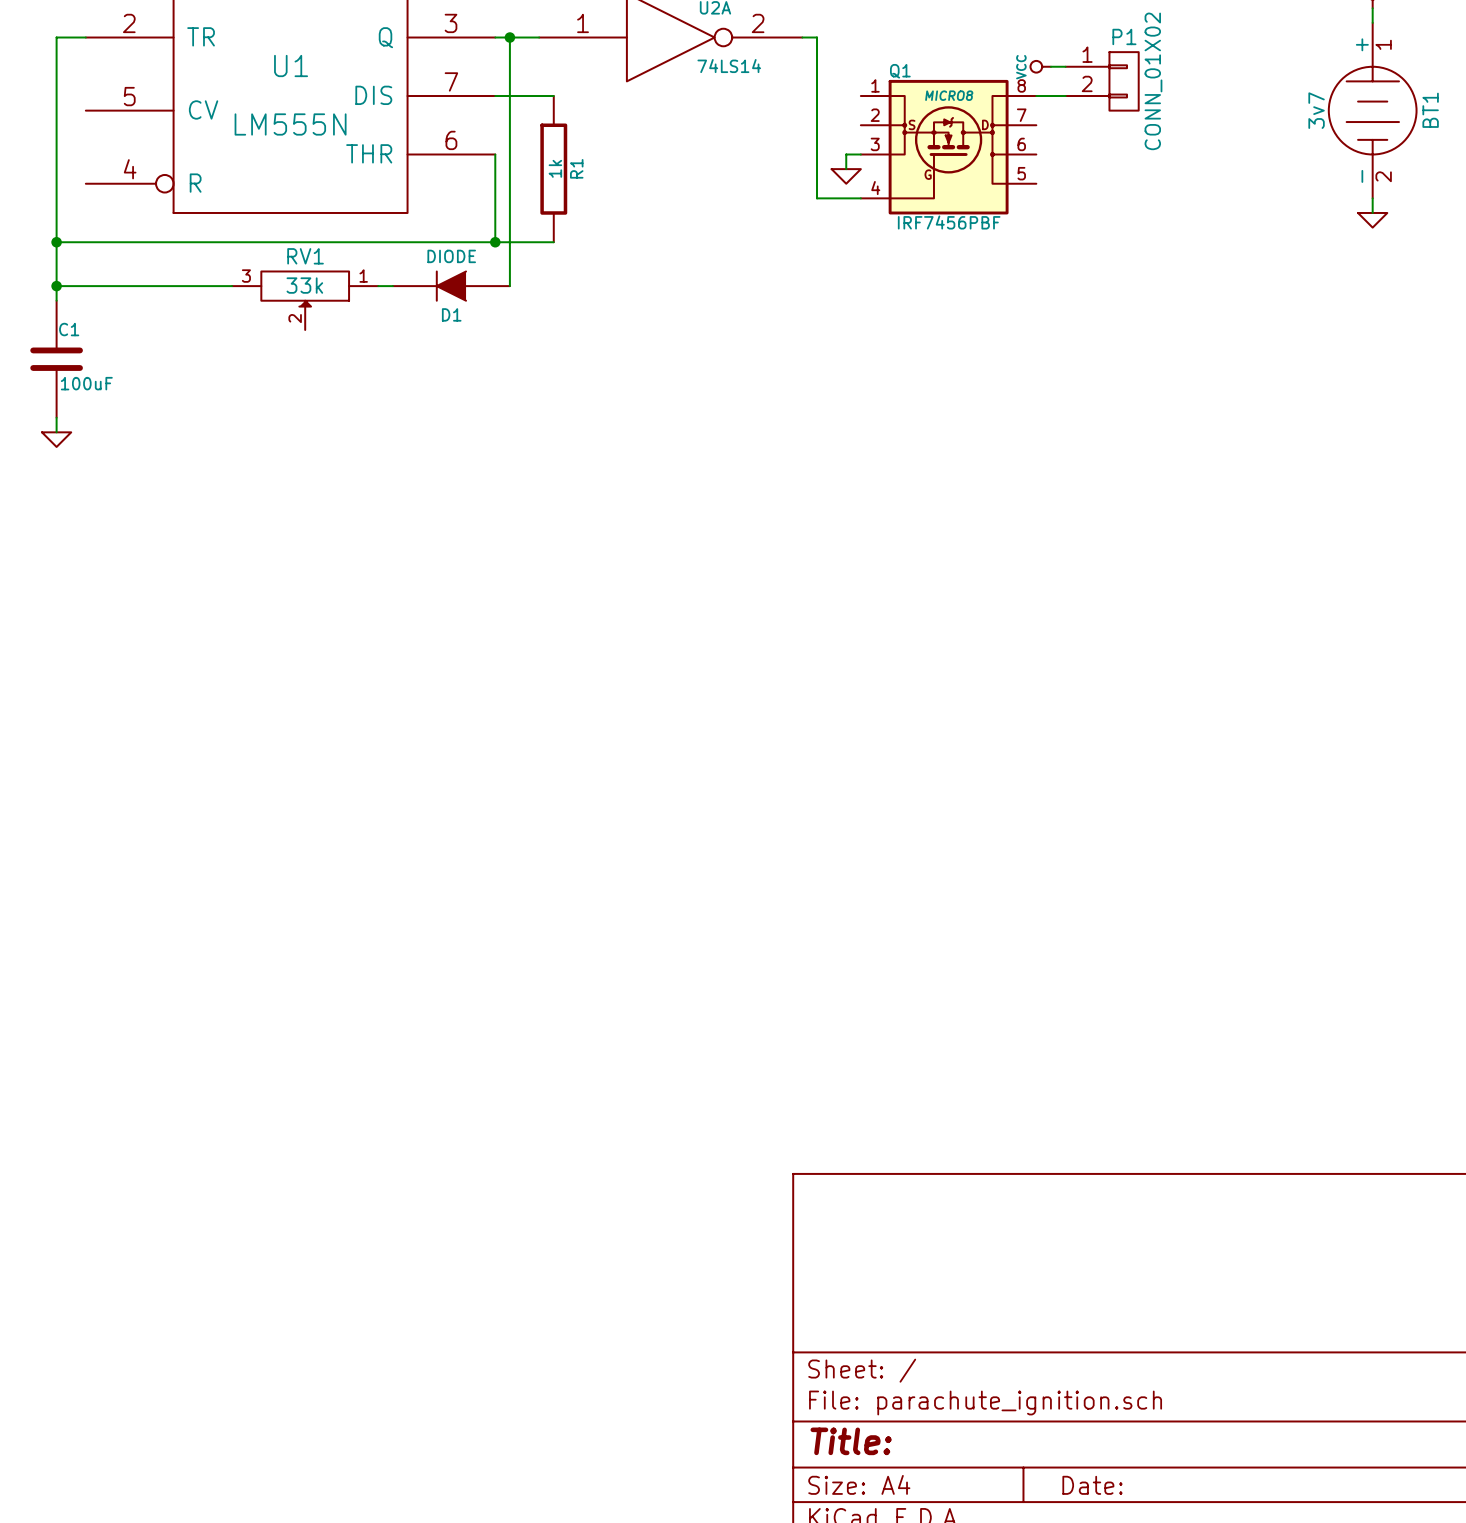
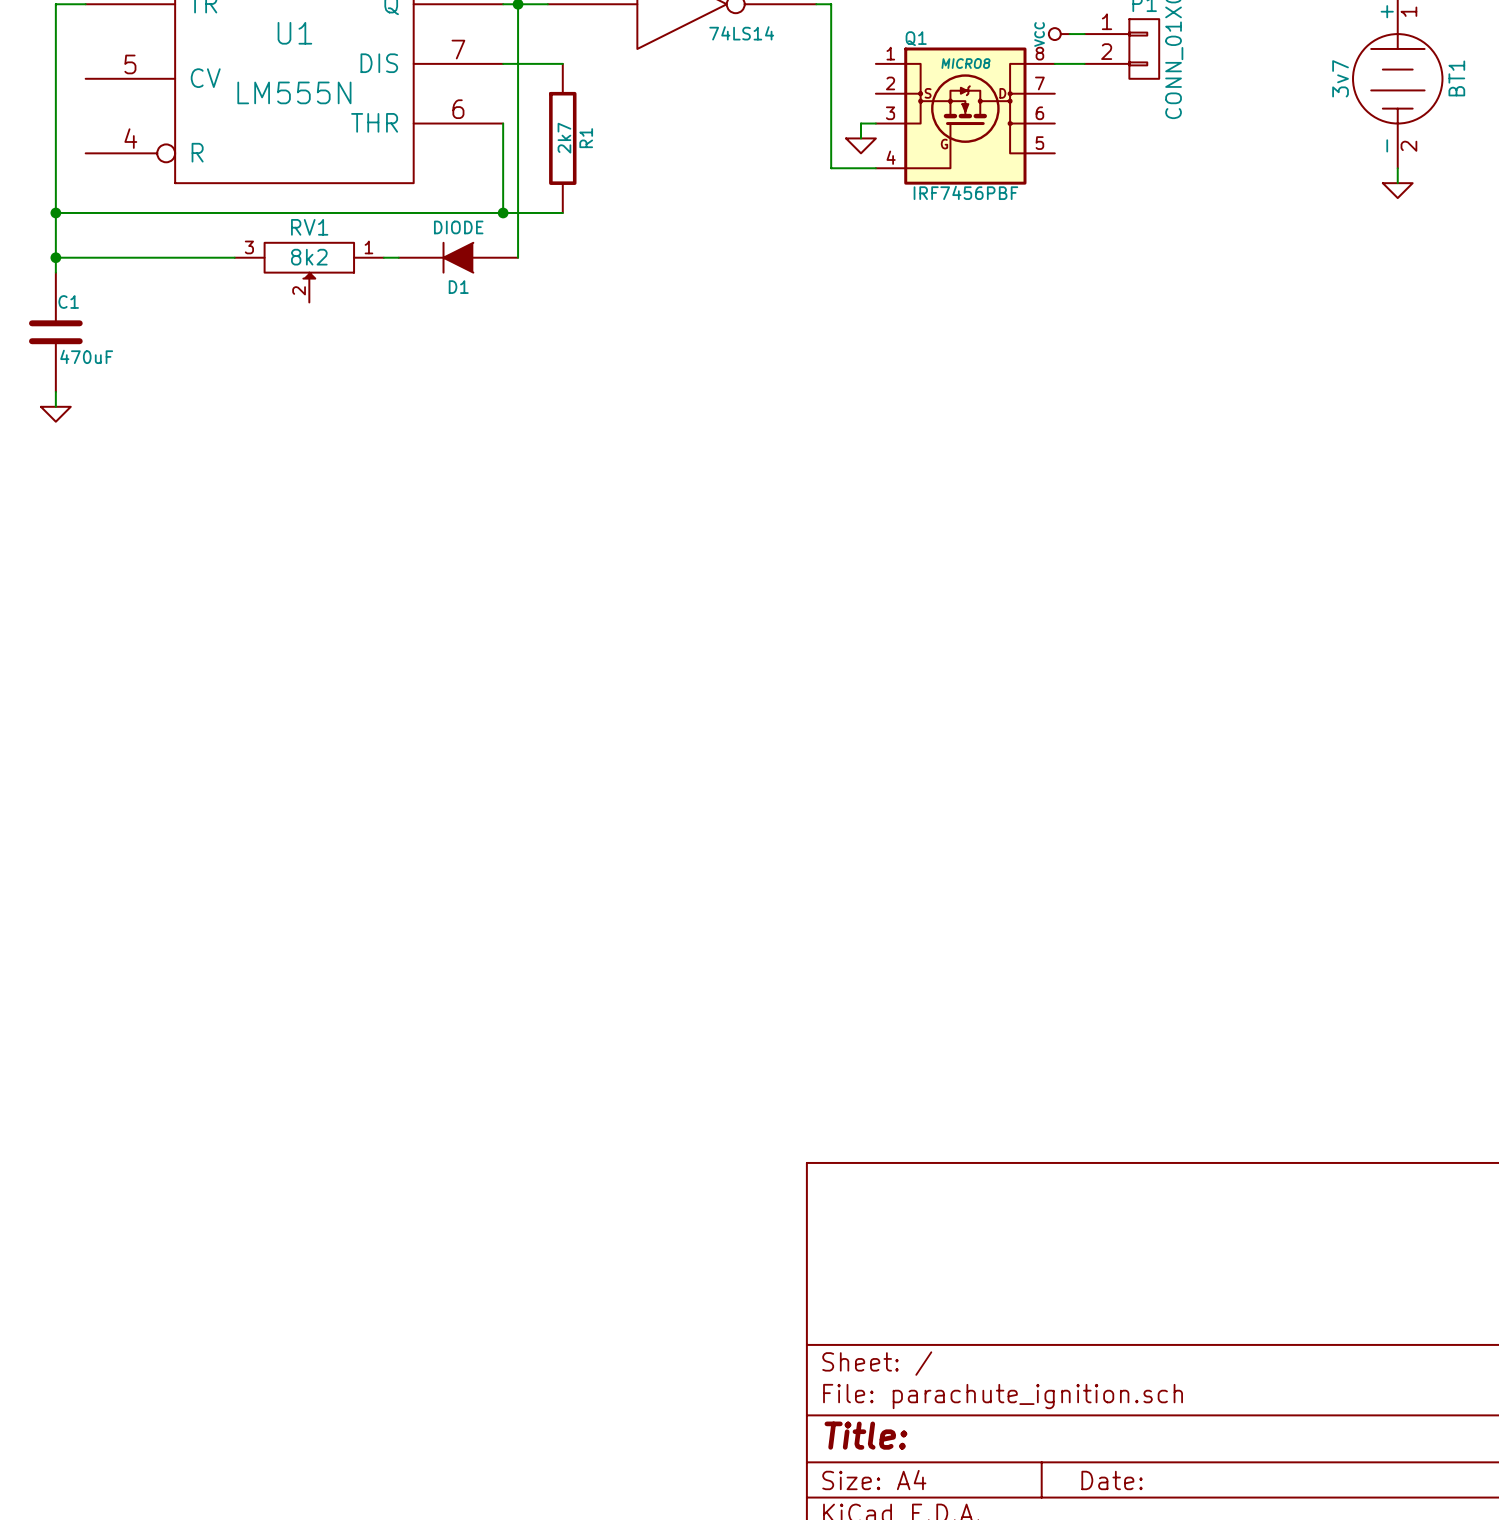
R1 value: 1k (555, 168) -> 2k7 (564, 138)
RV1 value: 33k (304, 285) -> 8k2 (309, 257)
C1 value: 100uF (86, 383) -> 470uF (86, 356)

